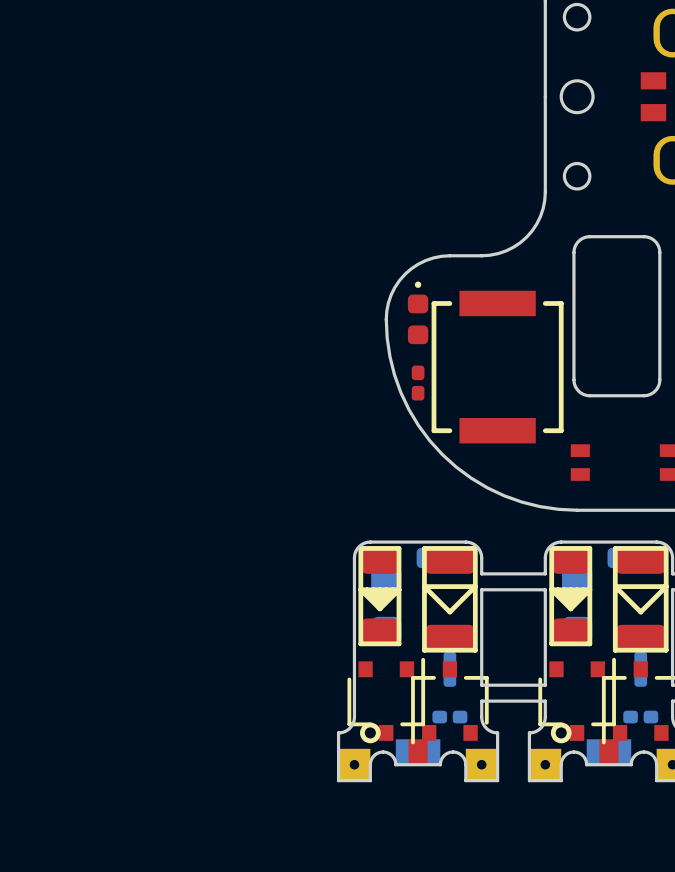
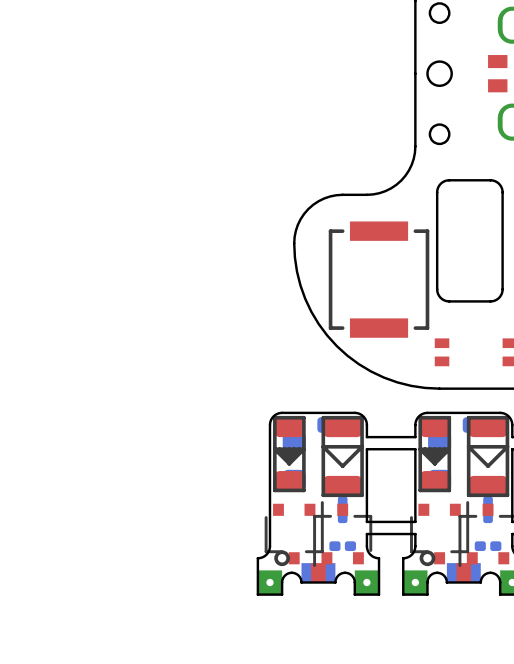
part: (418, 312) -> none
part: (418, 383) -> none

